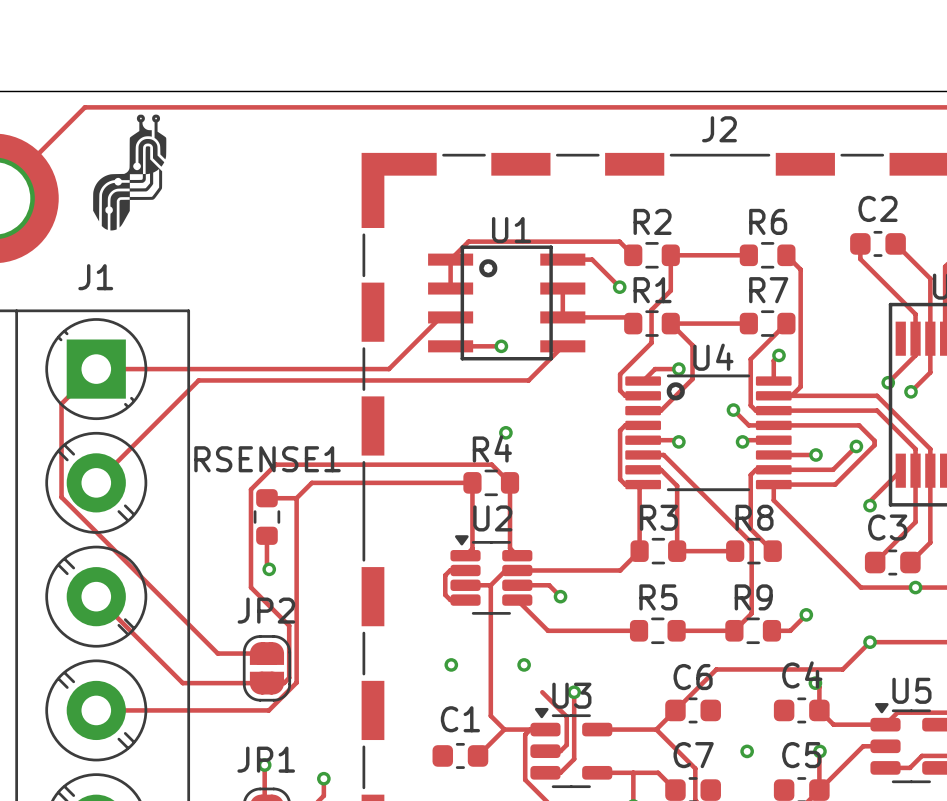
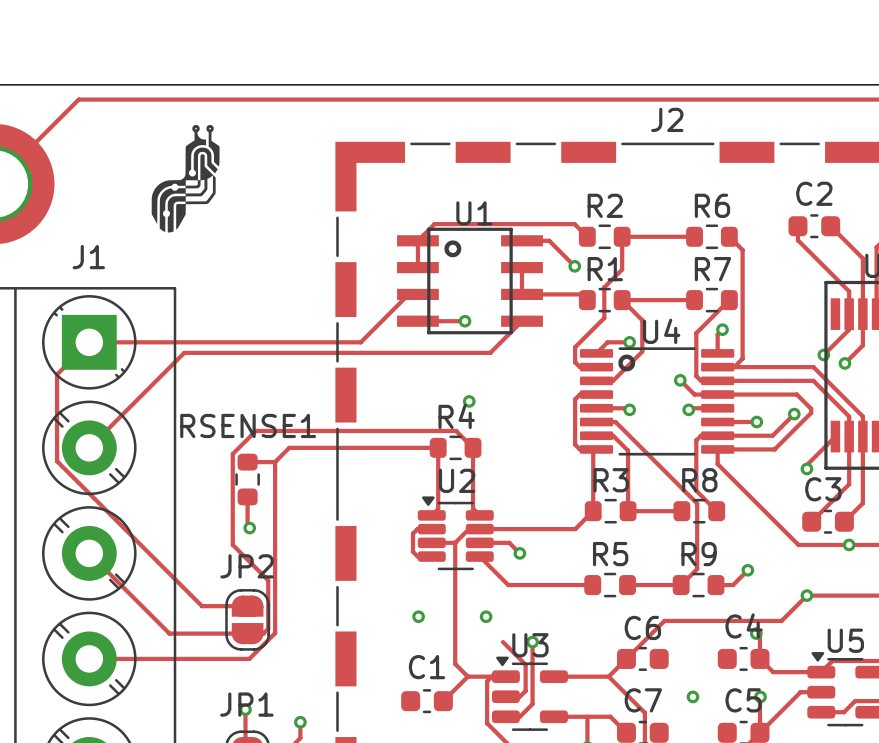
drawing position: (159, 136) -> (212, 145)
drawing position: (128, 172) -> (184, 178)

